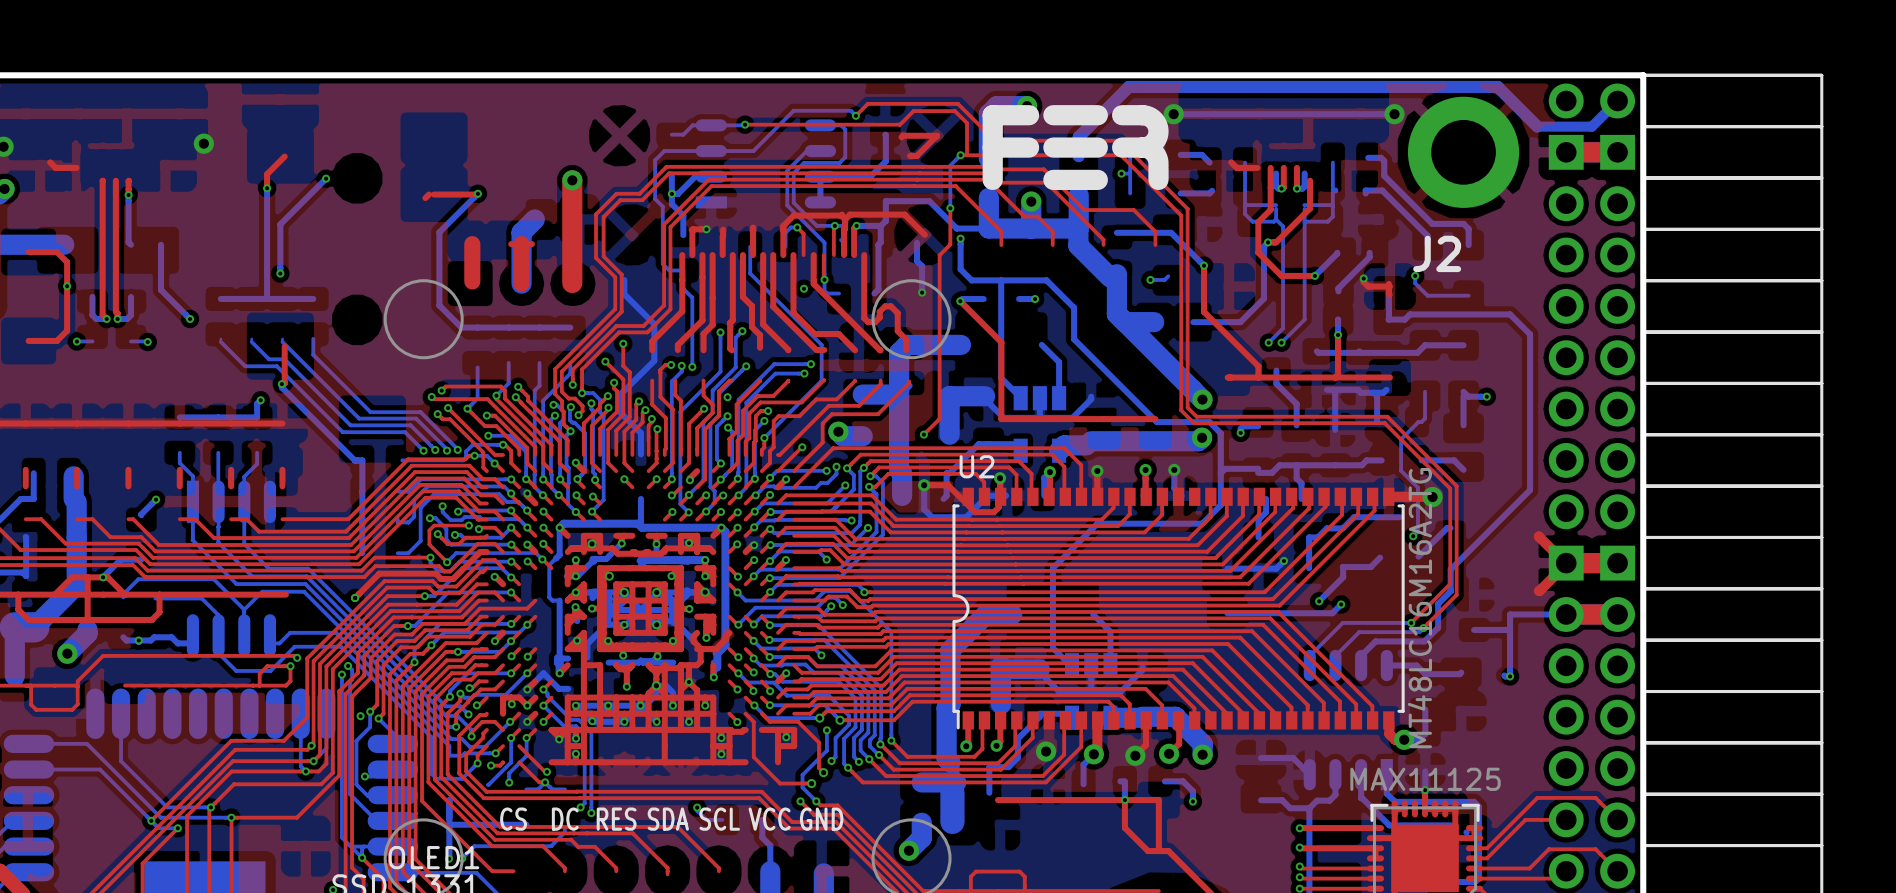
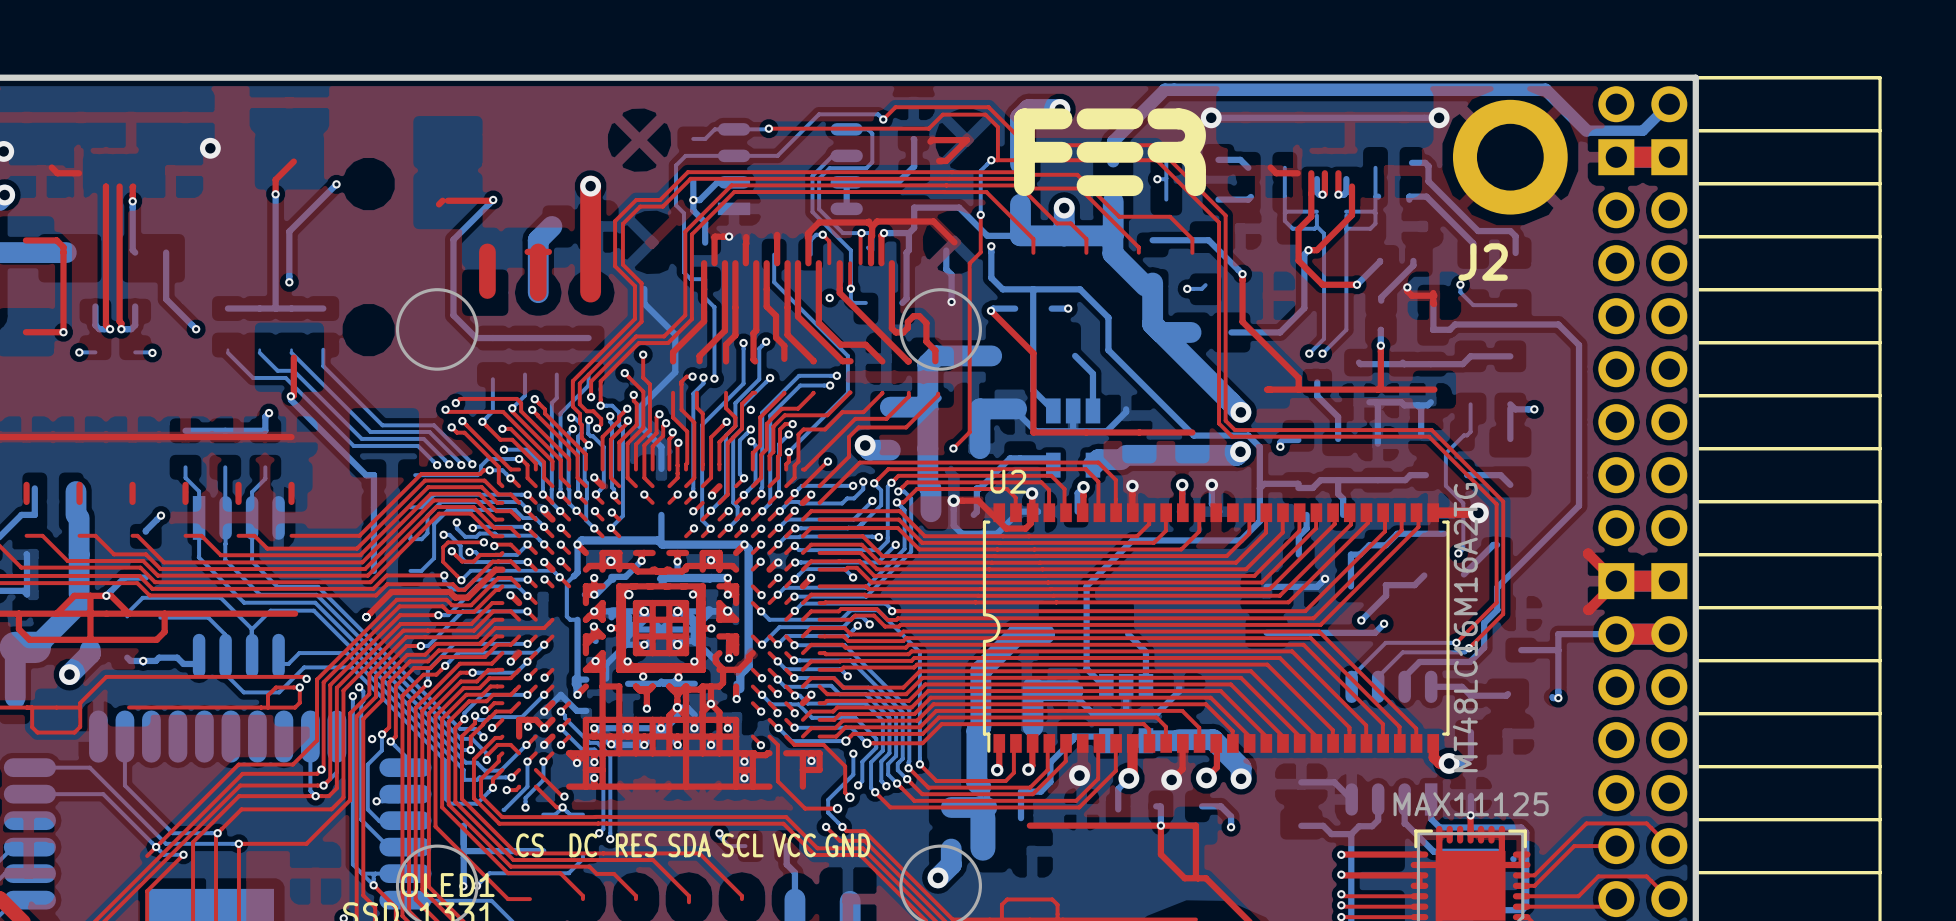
top track: none -> (25, 240) (56, 240) (63, 247) (63, 332) (25, 332)
top track: (28, 251) (56, 251) (67, 262) (67, 330) (56, 340) (28, 340) -> none
via position: (67, 286) -> (63, 332)
top track: none -> (156, 847) (147, 856)

